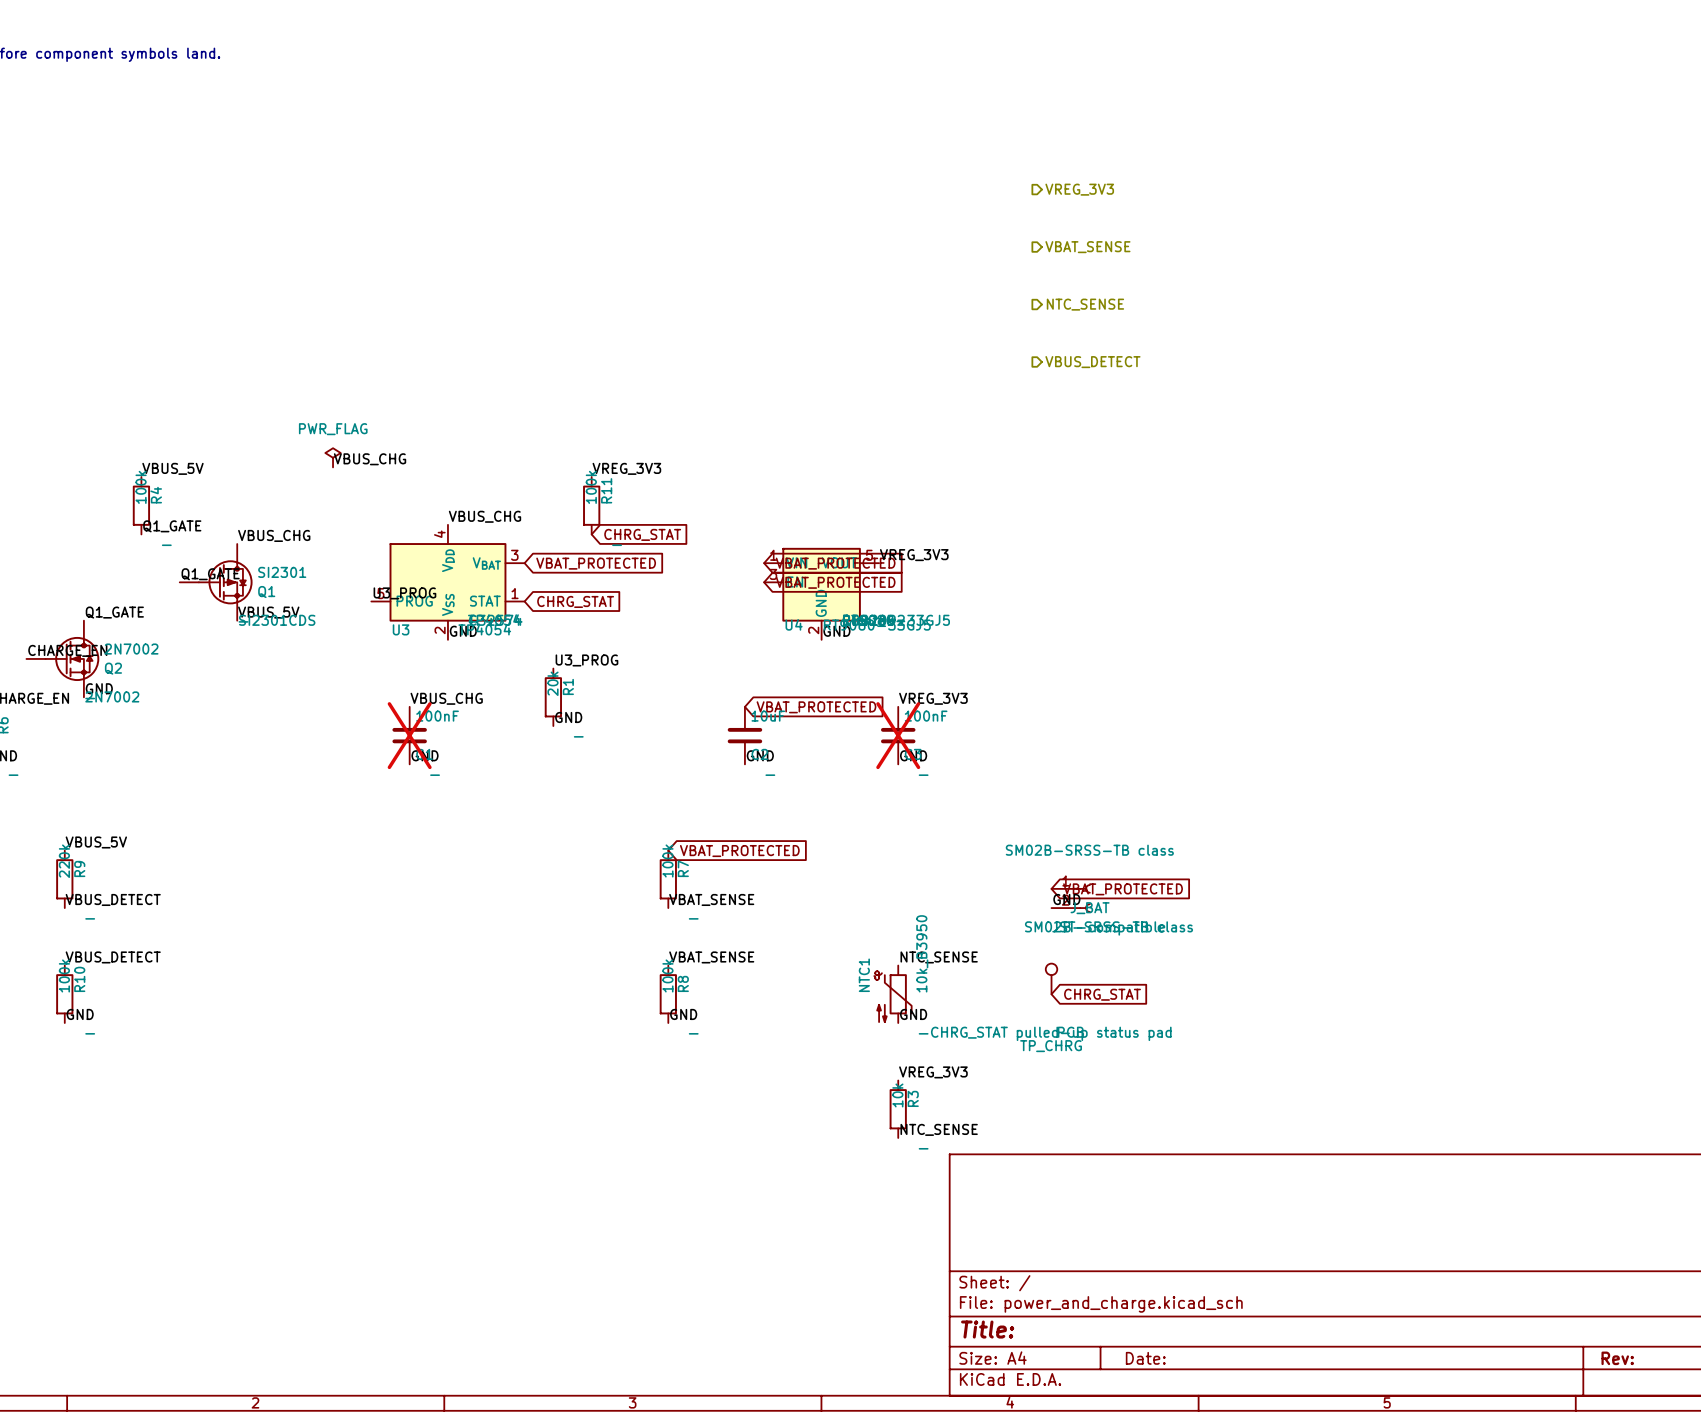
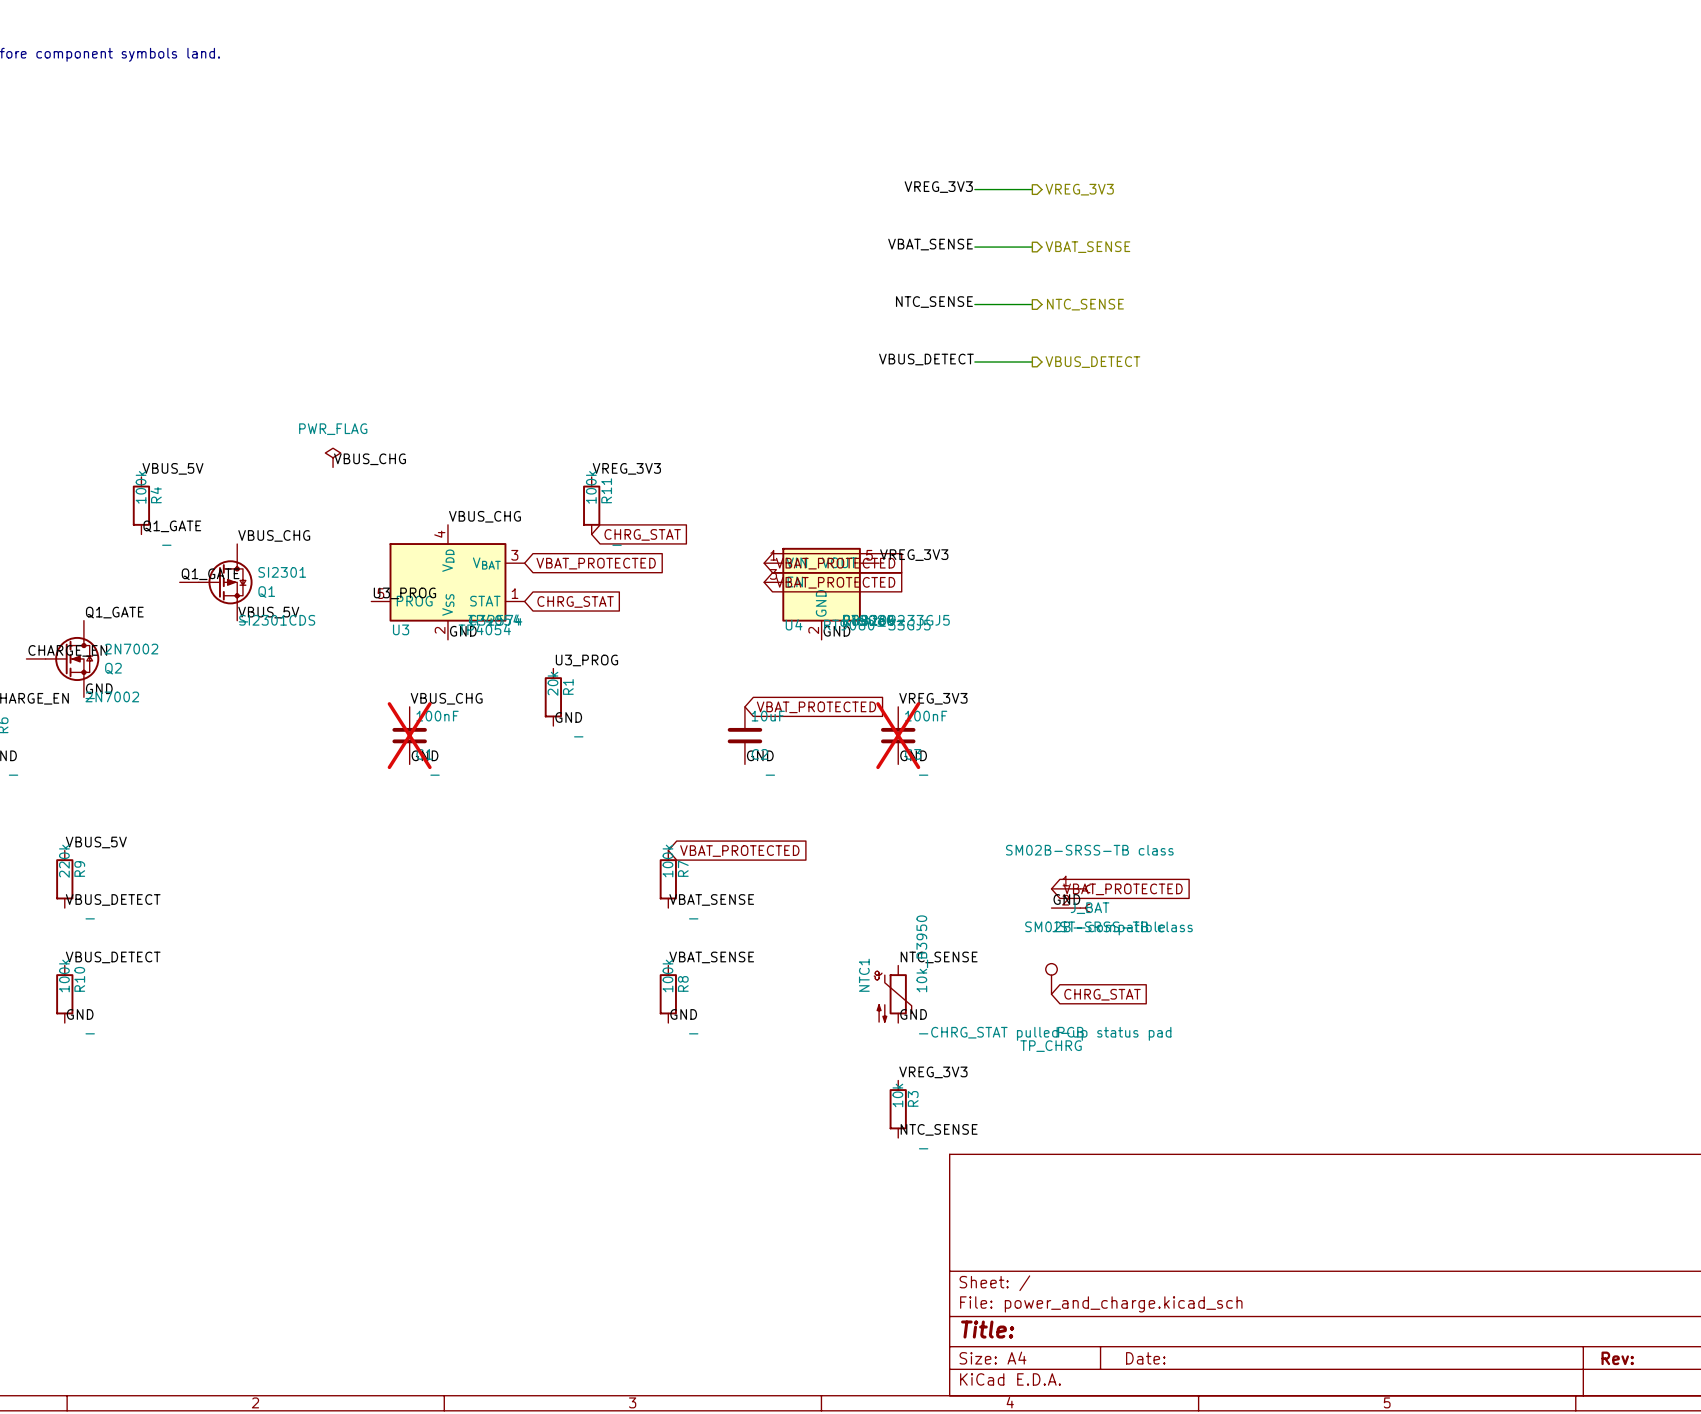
label: none -> VREG_3V3 (938, 187)
wire: none -> (974, 189) (1032, 189)
label: none -> VBAT_SENSE (930, 244)
wire: none -> (974, 247) (1032, 247)
label: none -> NTC_SENSE (934, 302)
wire: none -> (974, 304) (1032, 304)
label: none -> VBUS_DETECT (926, 359)
wire: none -> (974, 362) (1032, 362)

